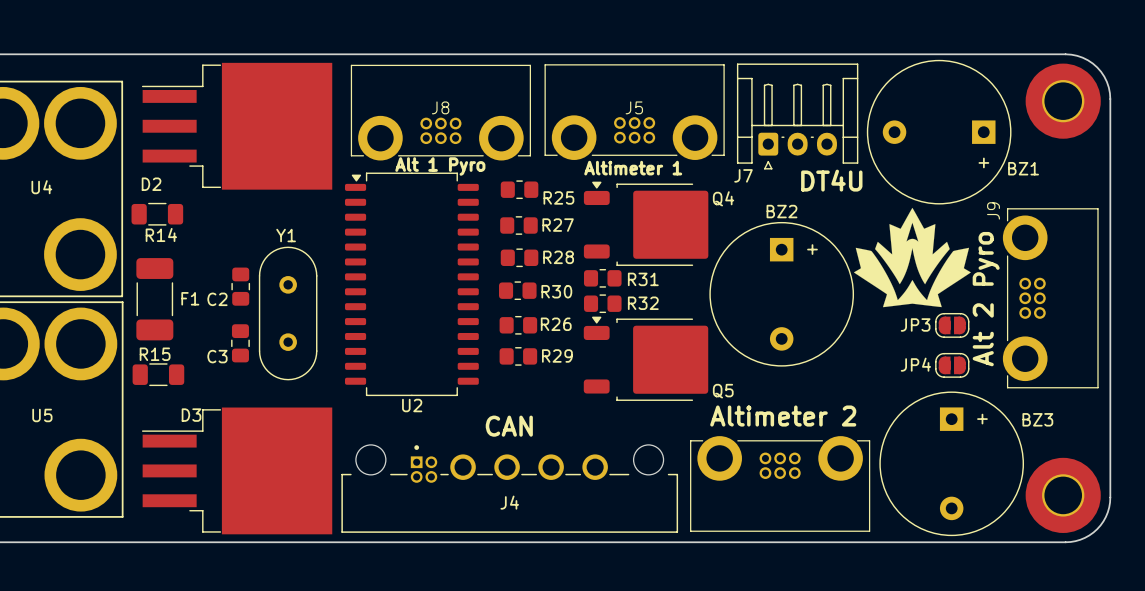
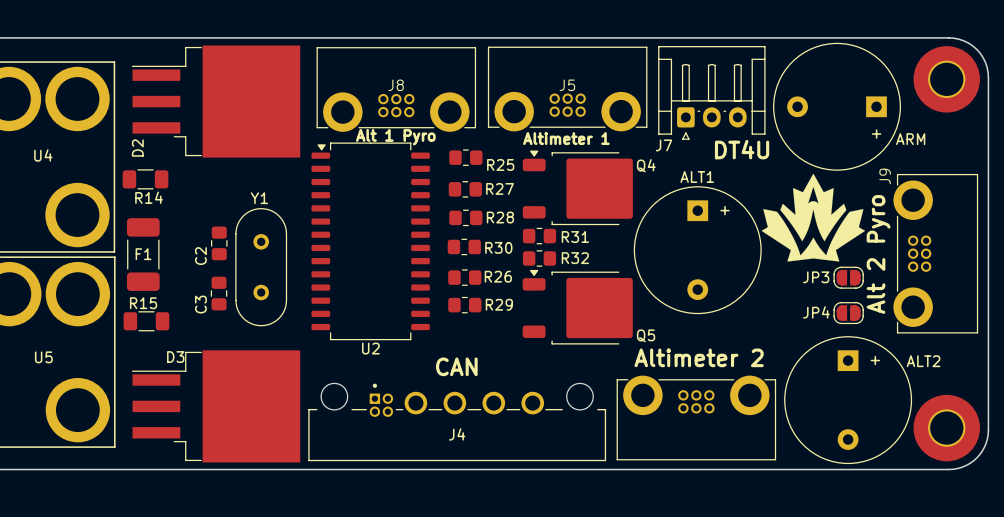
BZ1 name: BZ1 (1023, 168) -> ARM (910, 139)
D2 name rotation: 0° (151, 184) -> 90° counterclockwise (137, 148)
BZ2 name: BZ2 (781, 211) -> ALT1 (697, 176)
F1 name position: F1 (190, 298) -> F1 (143, 254)
C2 name rotation: 0° (217, 299) -> 90° counterclockwise (200, 256)
C3 name rotation: 0° (217, 356) -> 90° counterclockwise (200, 304)
BZ3 name: BZ3 (1037, 419) -> ALT2 (923, 361)

